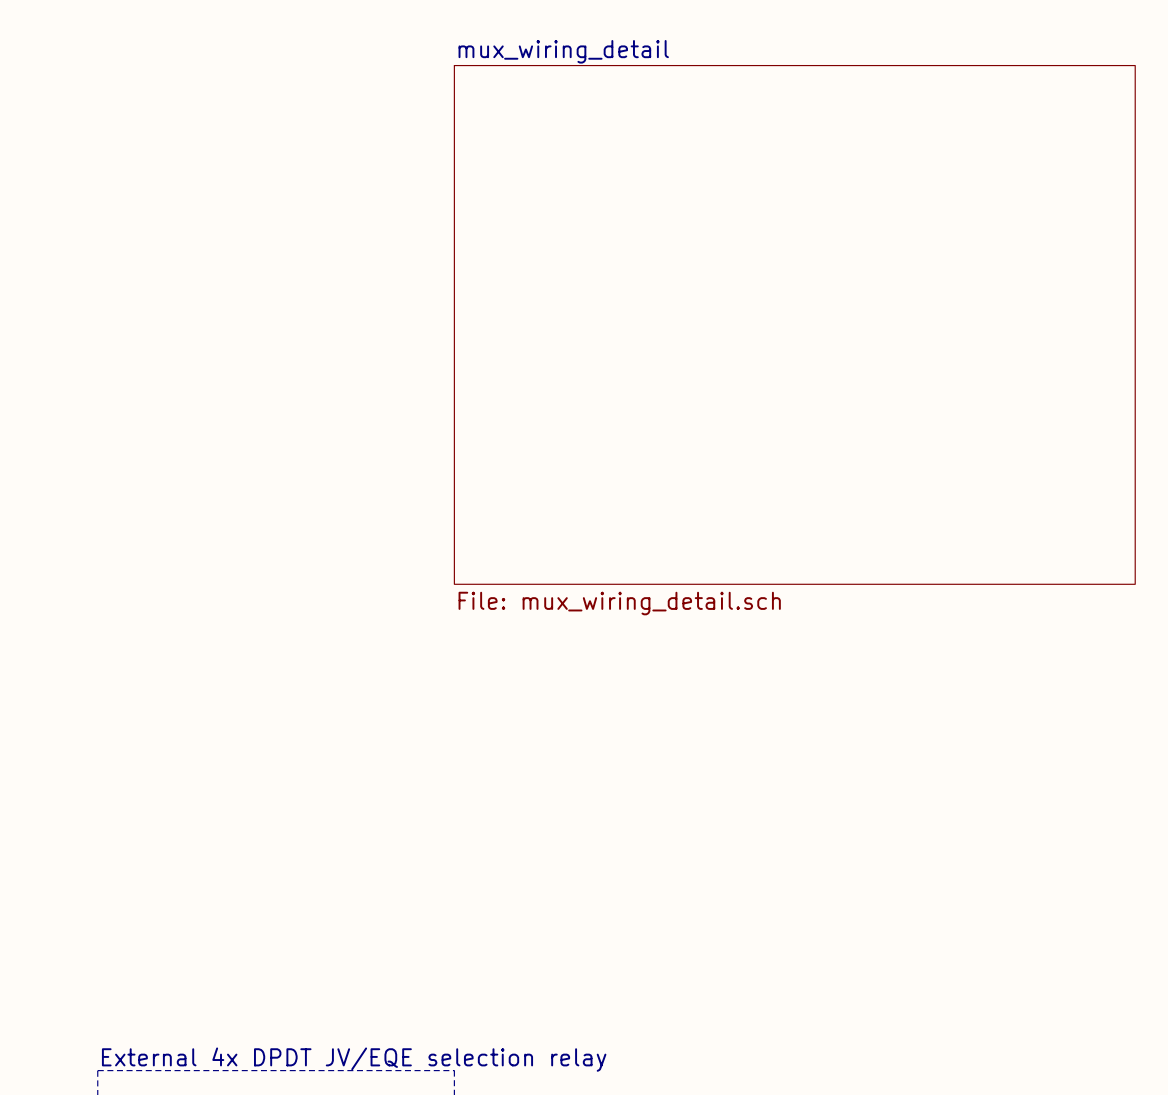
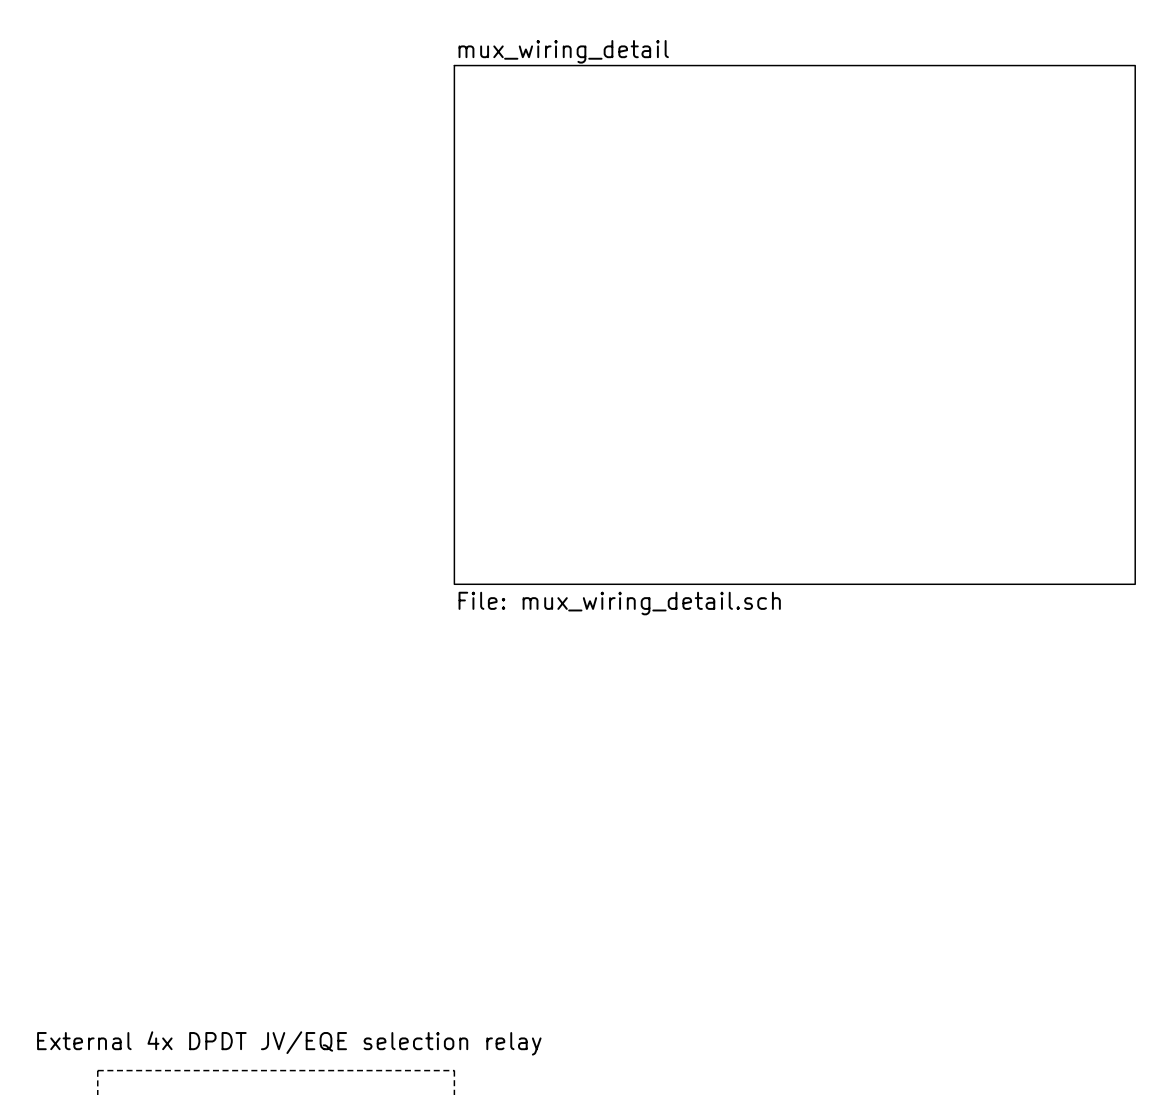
text position: External 4x DPDT JV/EQE selection relay (354, 1059) -> External 4x DPDT JV/EQE selection relay (289, 1043)

